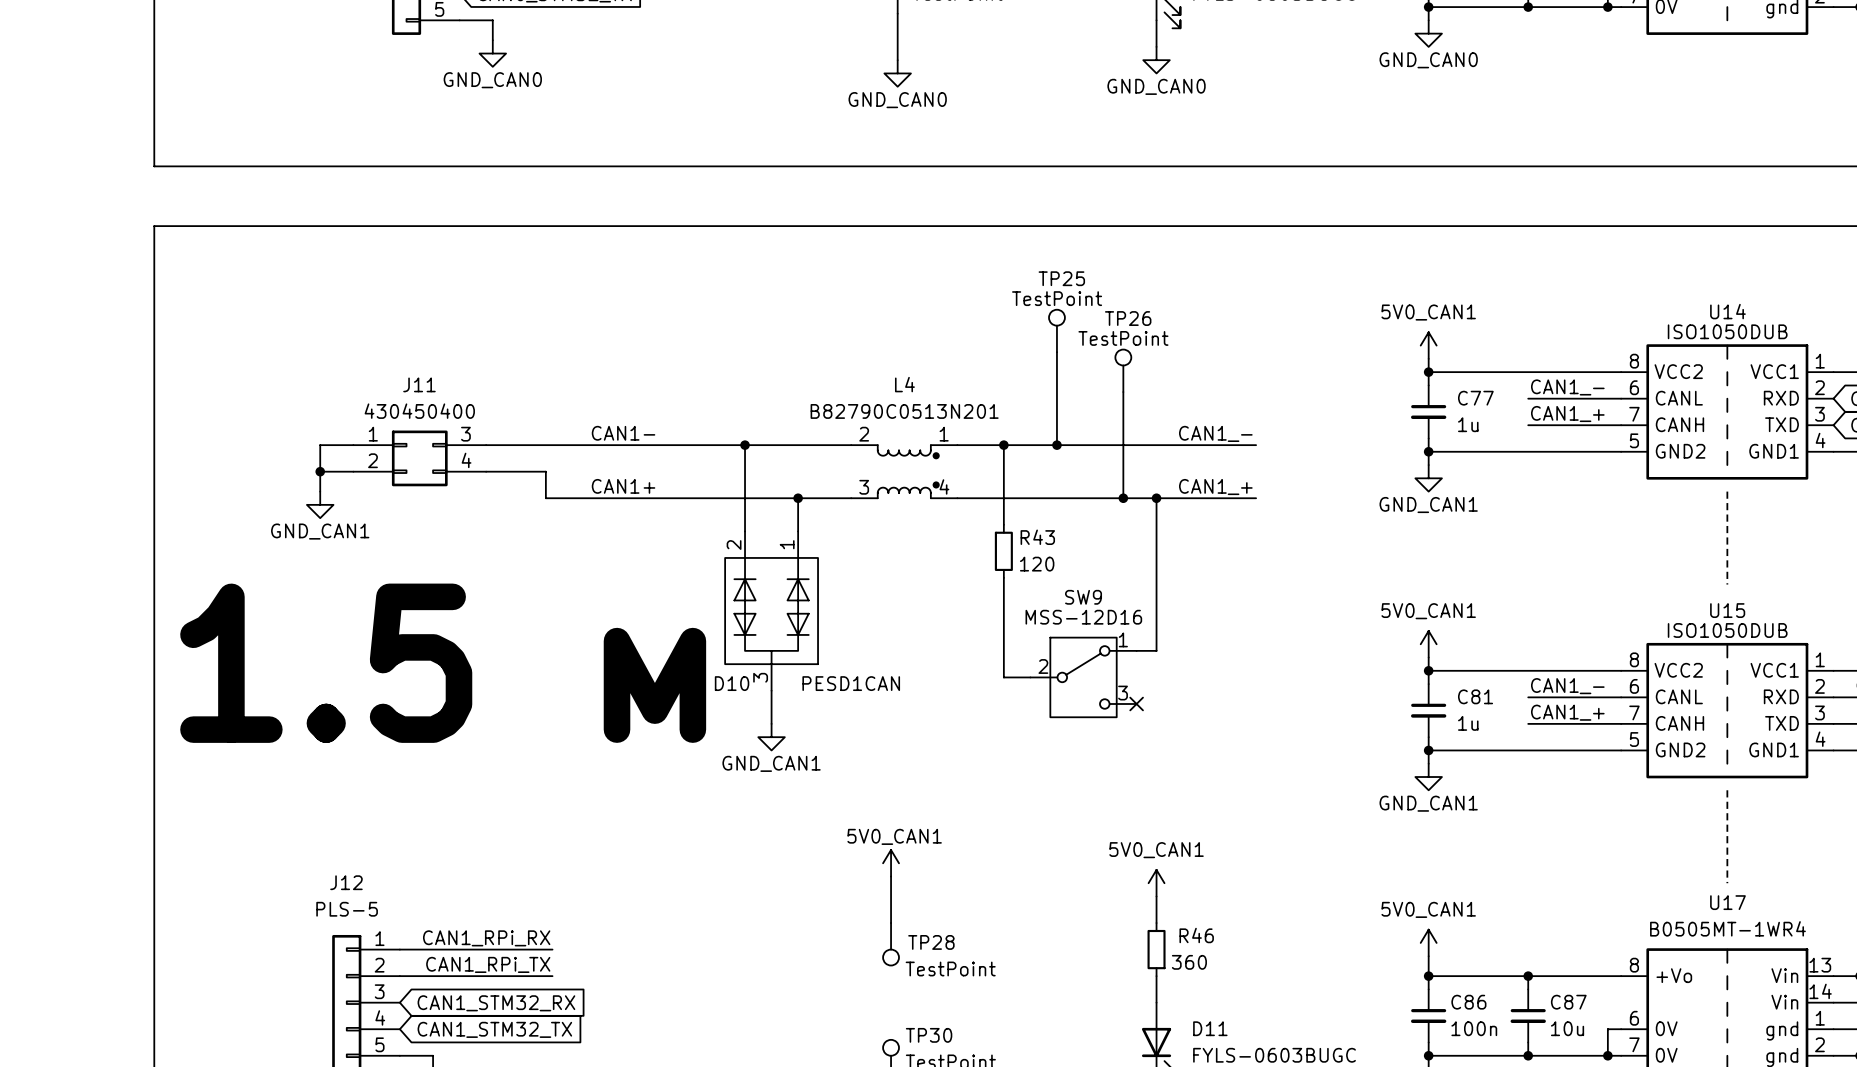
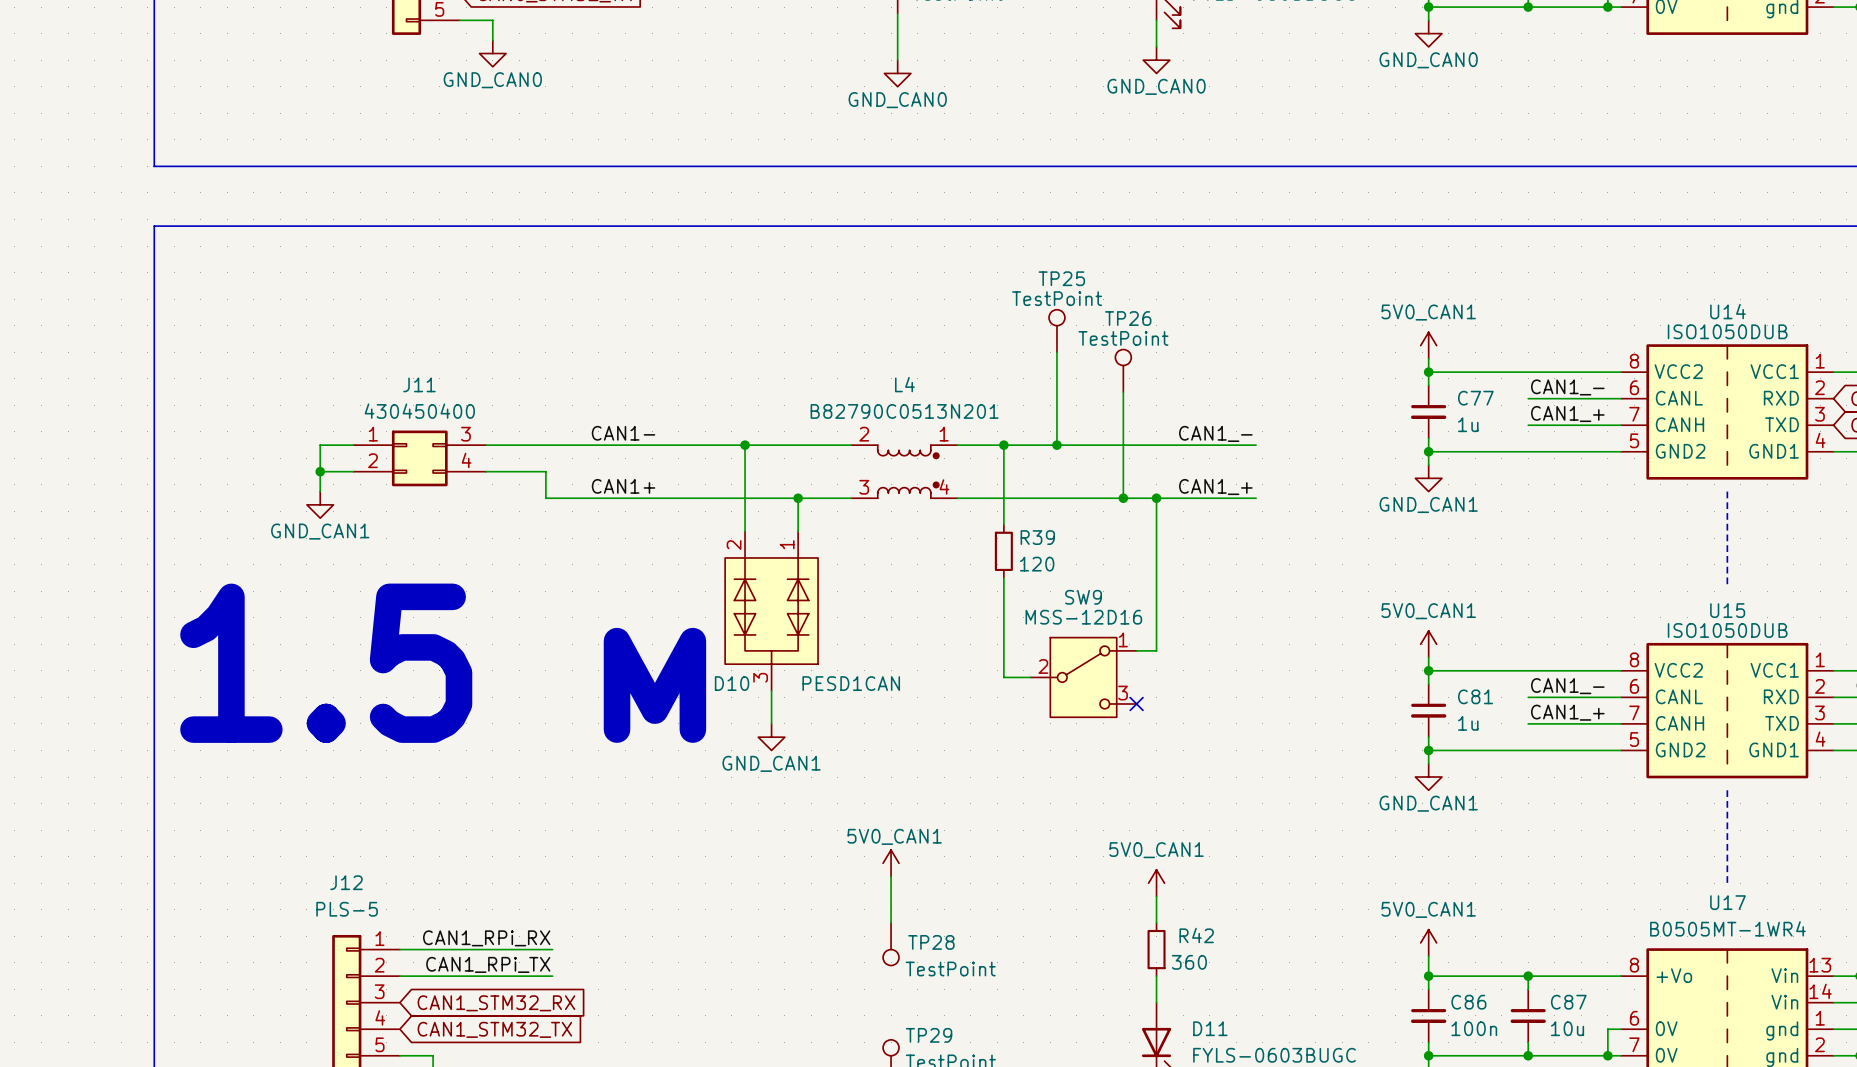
R43 name: R43 (1037, 537) -> R39 (1037, 537)
R46 name: R46 (1196, 935) -> R42 (1196, 935)
TP30 name: TP30 (929, 1035) -> TP29 (929, 1035)

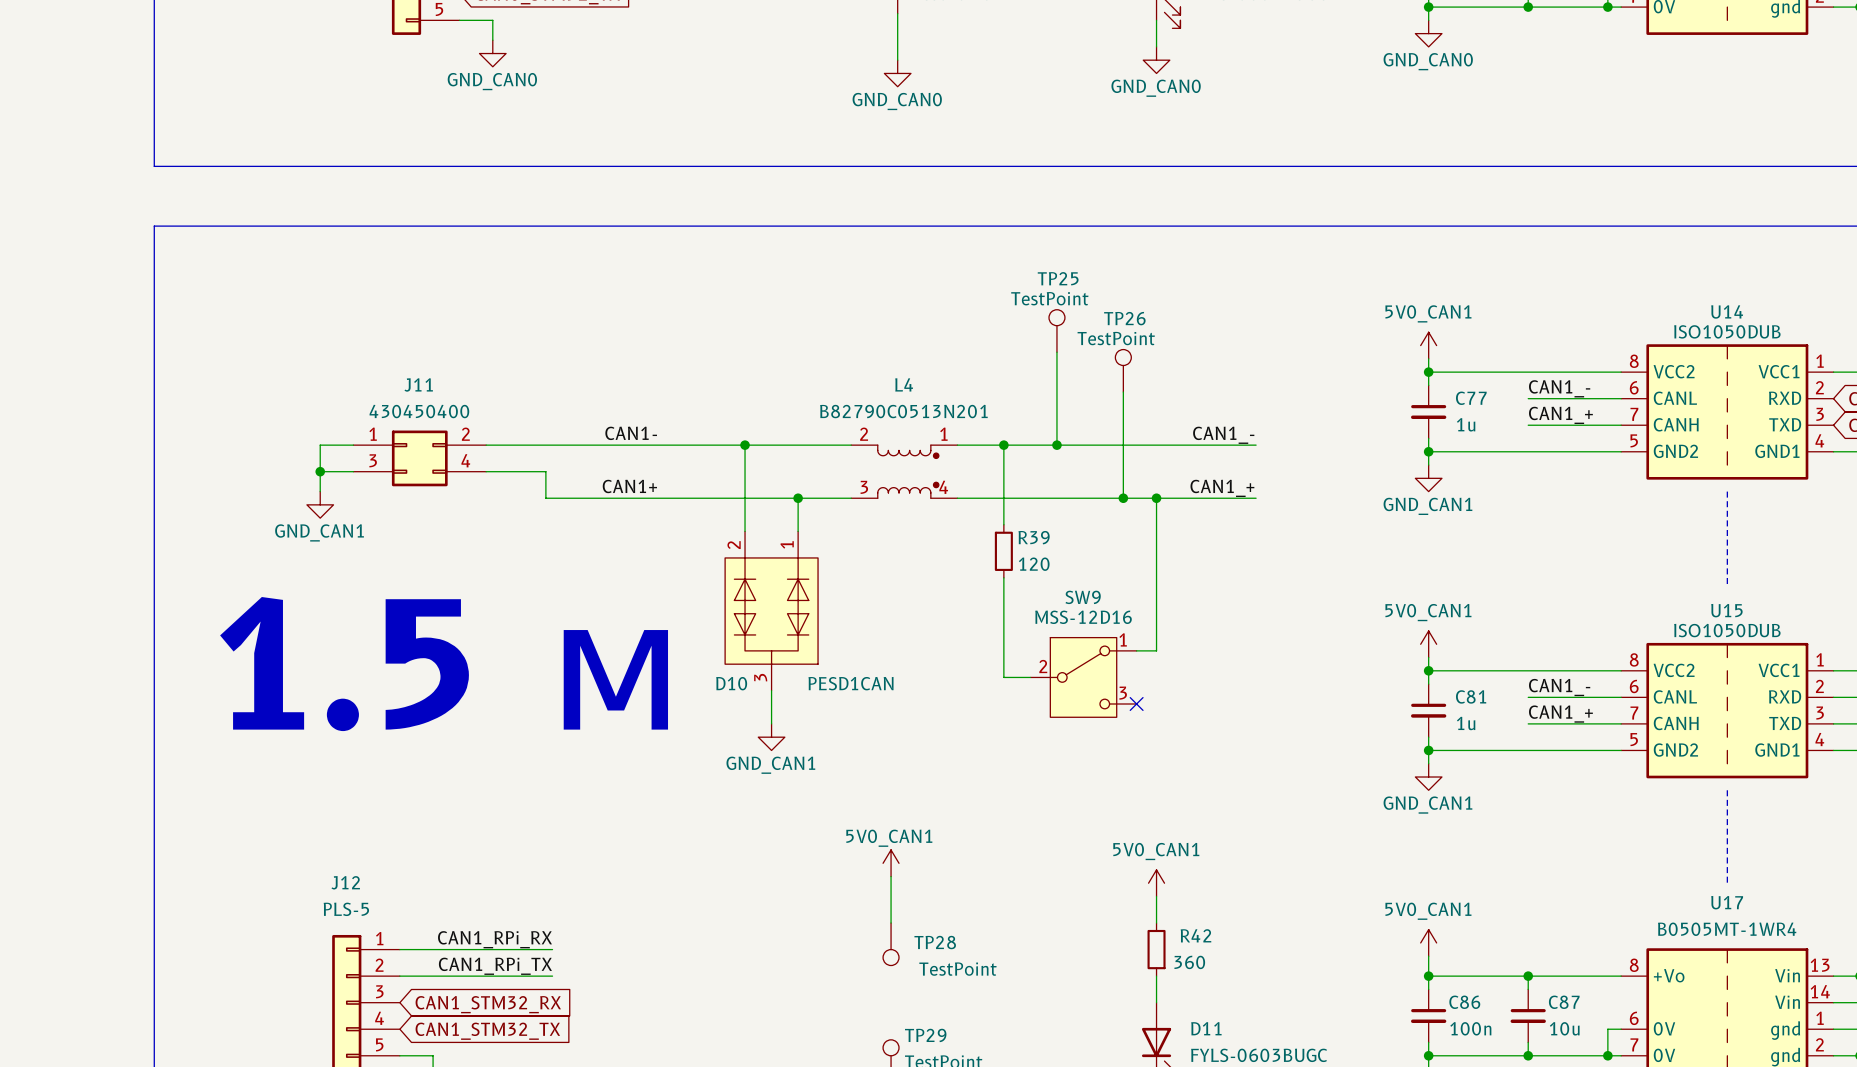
J11 pin number: 3 (465, 434) -> 2 (465, 434)
J11 pin number: 2 (373, 460) -> 3 (373, 460)

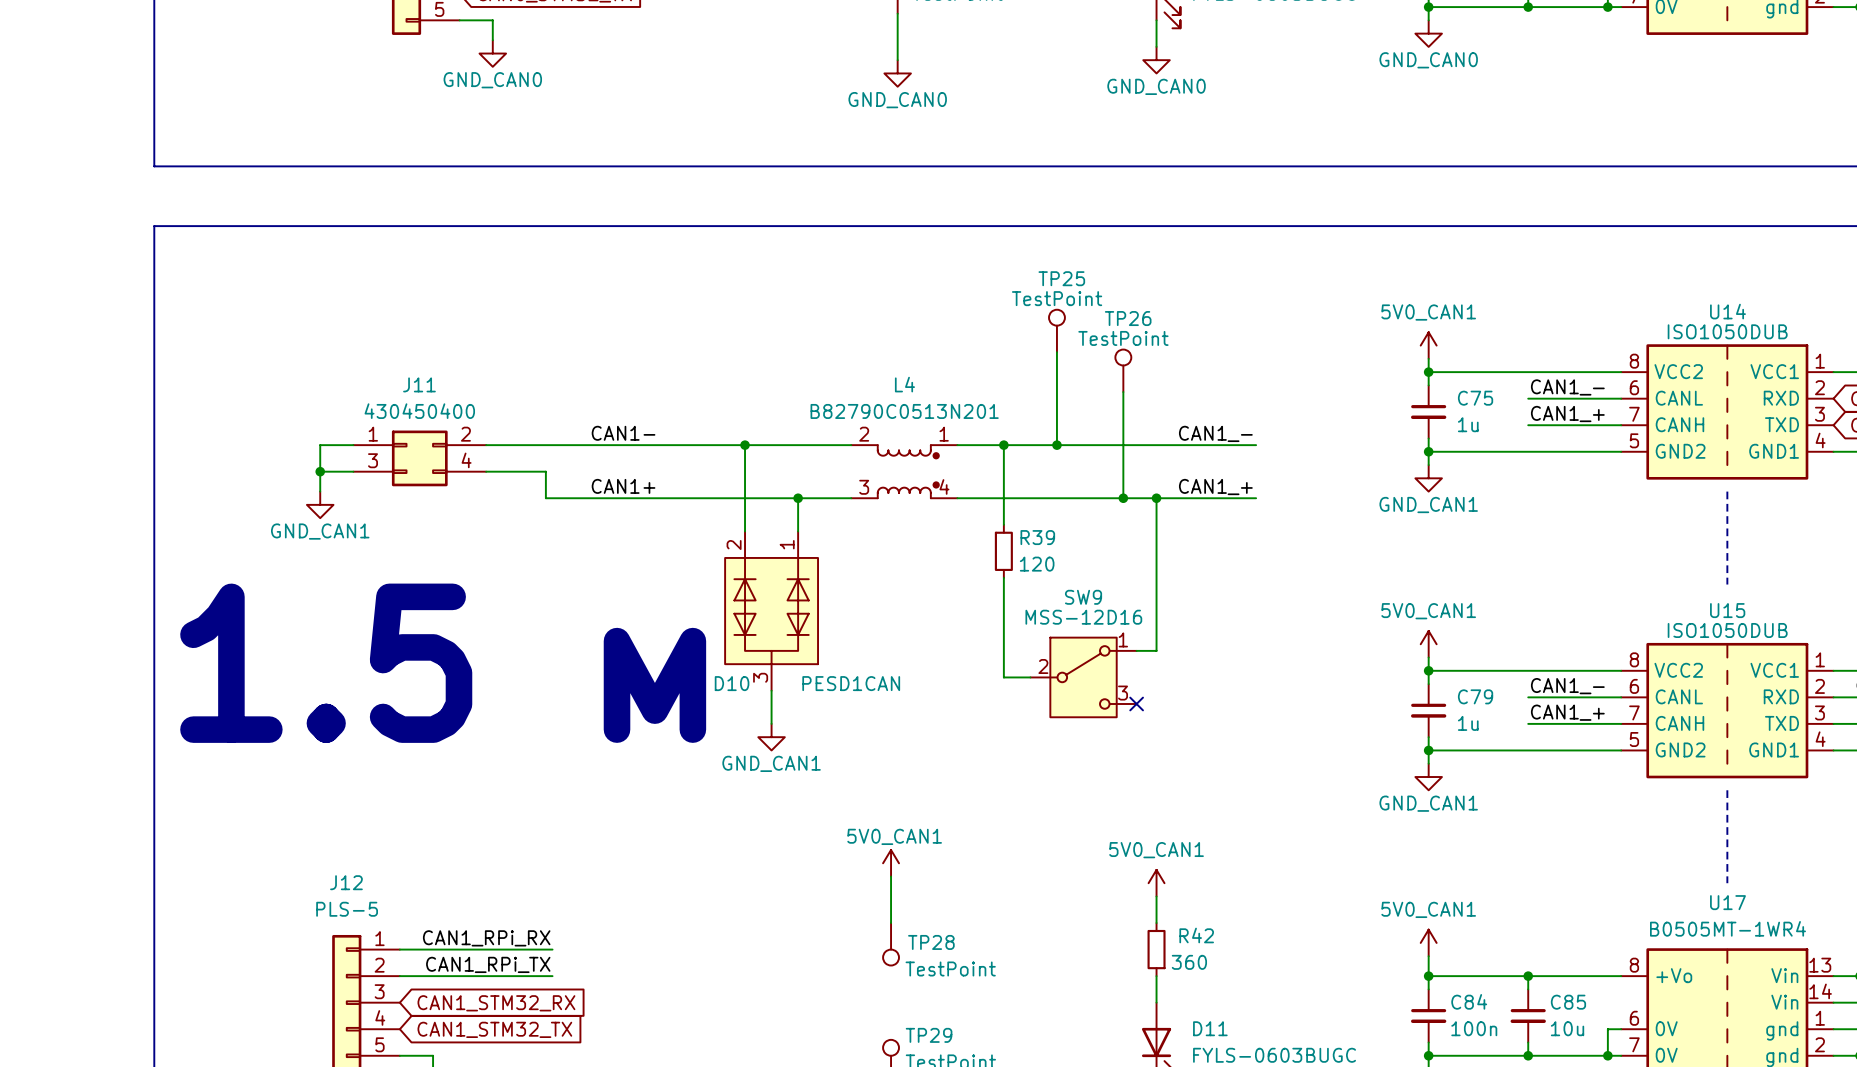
C77 name: C77 (1471, 398) -> C75 (1475, 398)
C81 name: C81 (1471, 696) -> C79 (1475, 696)
C86 name: C86 (1464, 1002) -> C84 (1469, 1001)
C87 name: C87 (1564, 1002) -> C85 (1568, 1002)

